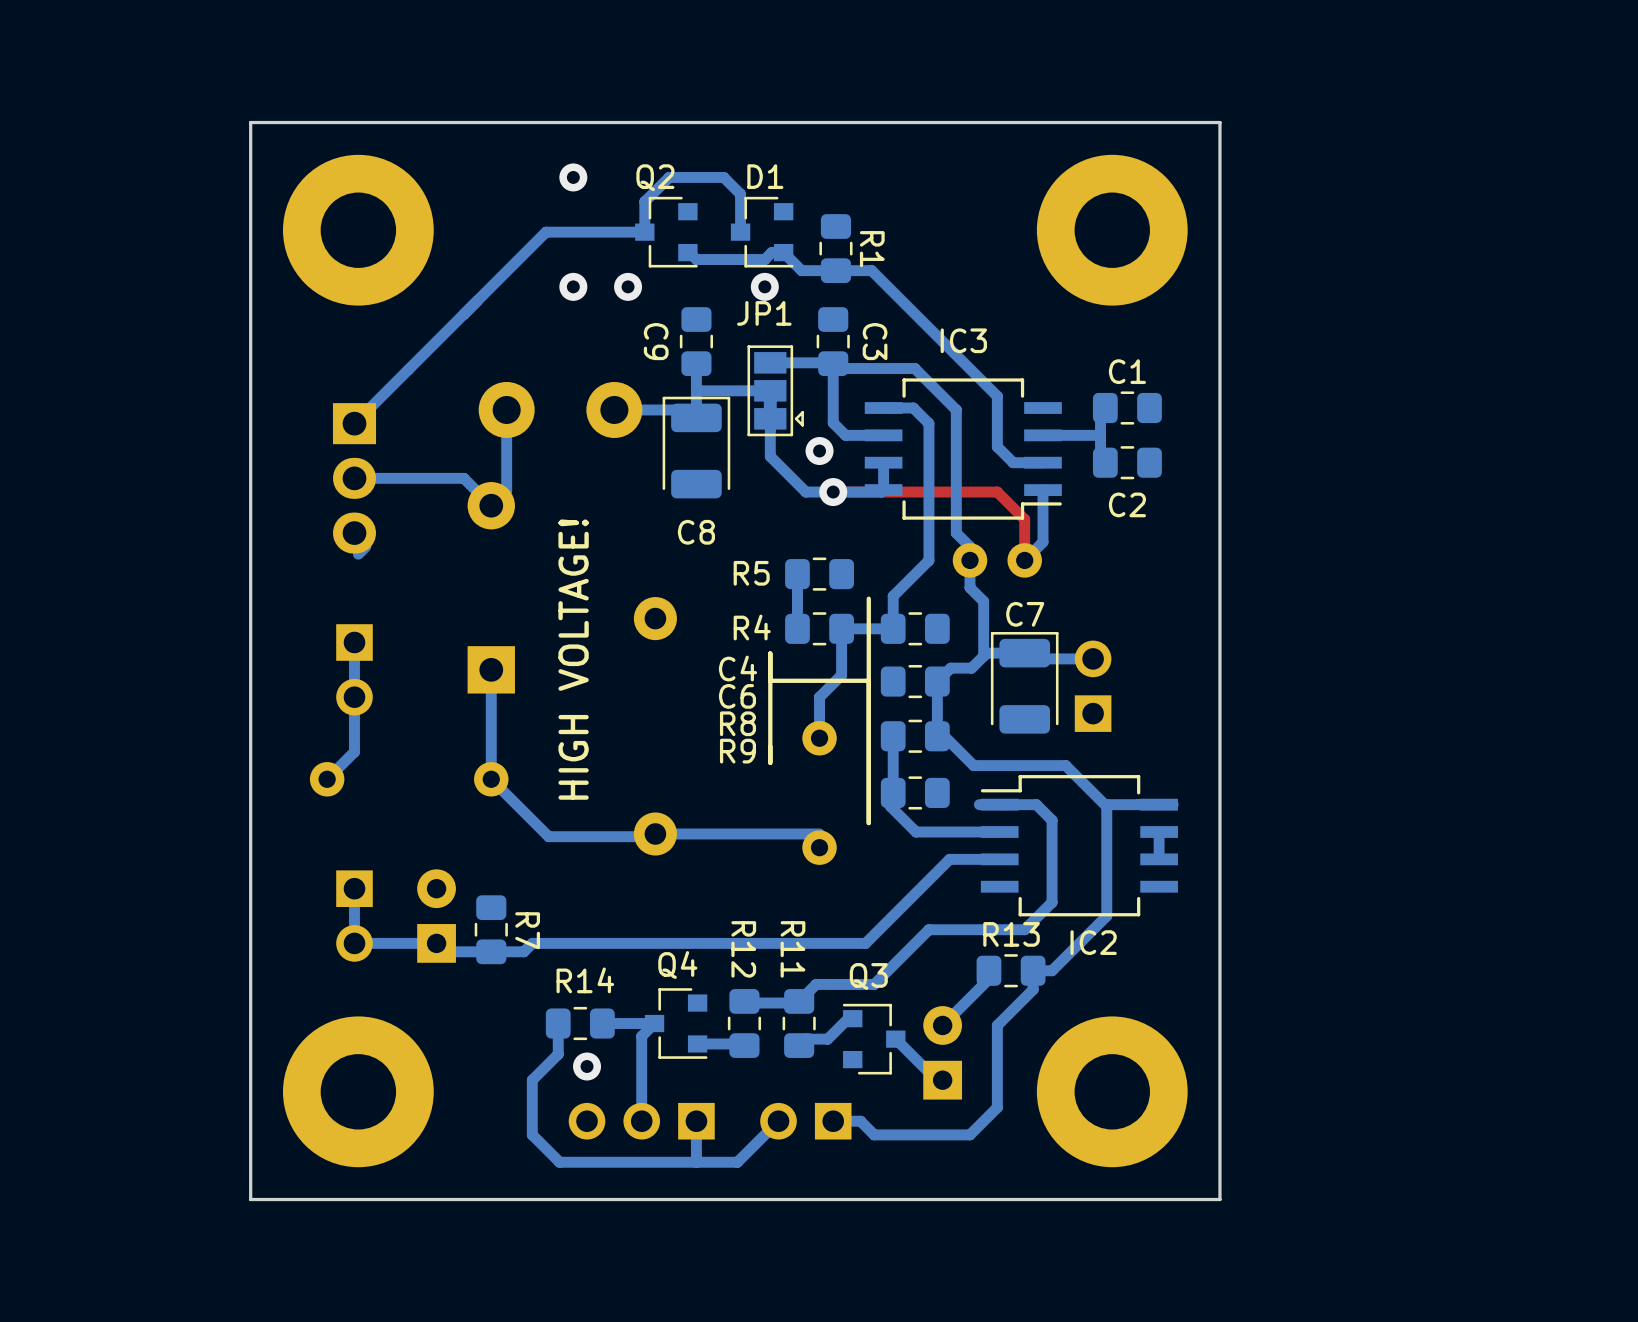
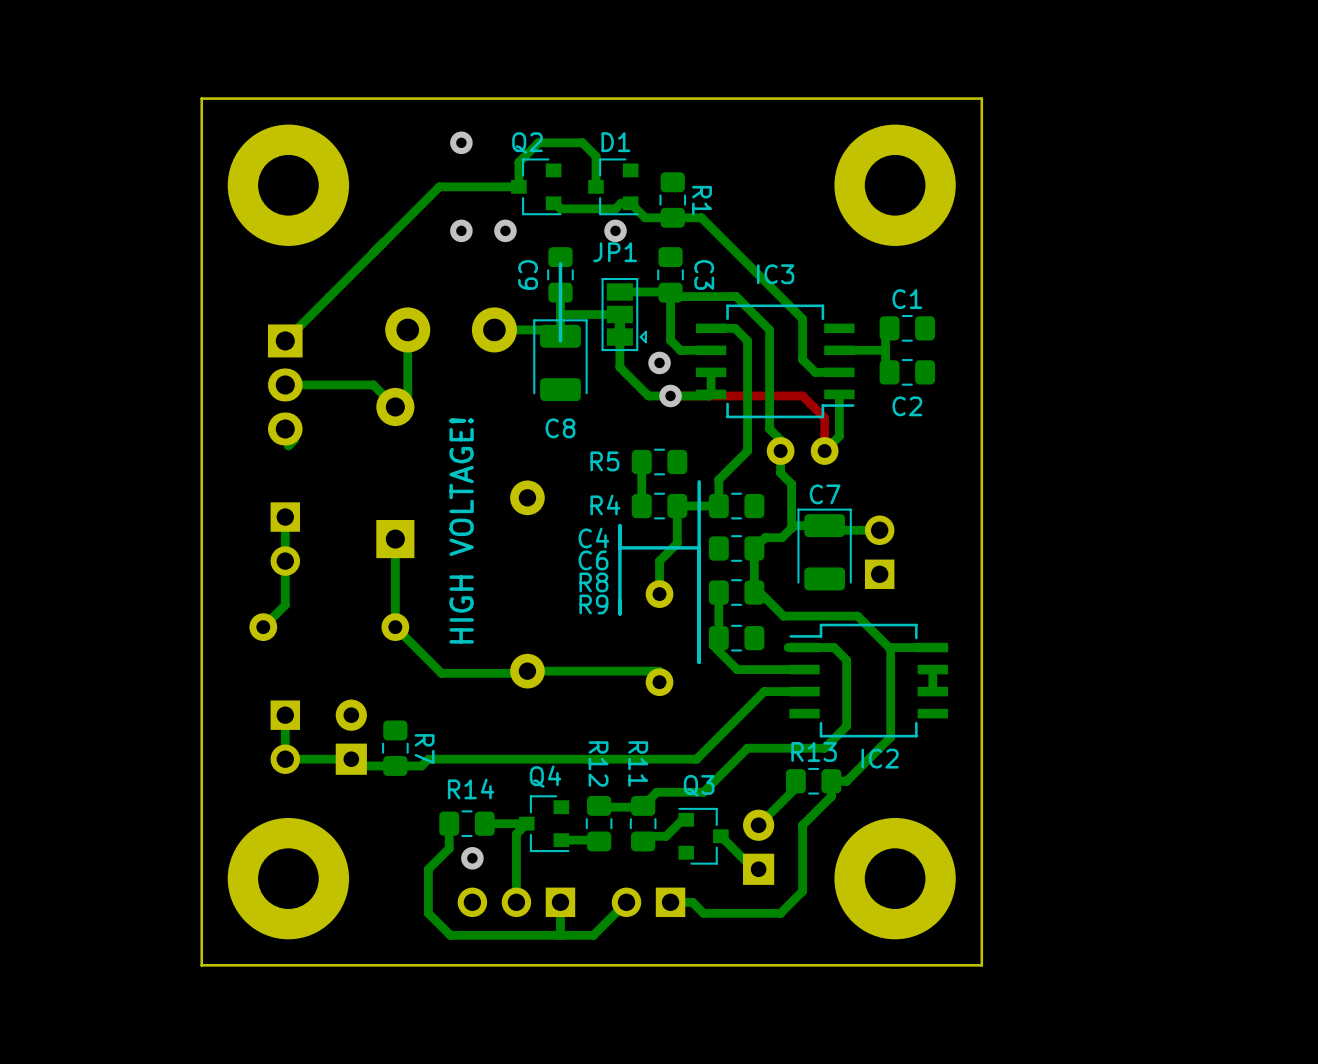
line: none -> (560, 263) (560, 340)

